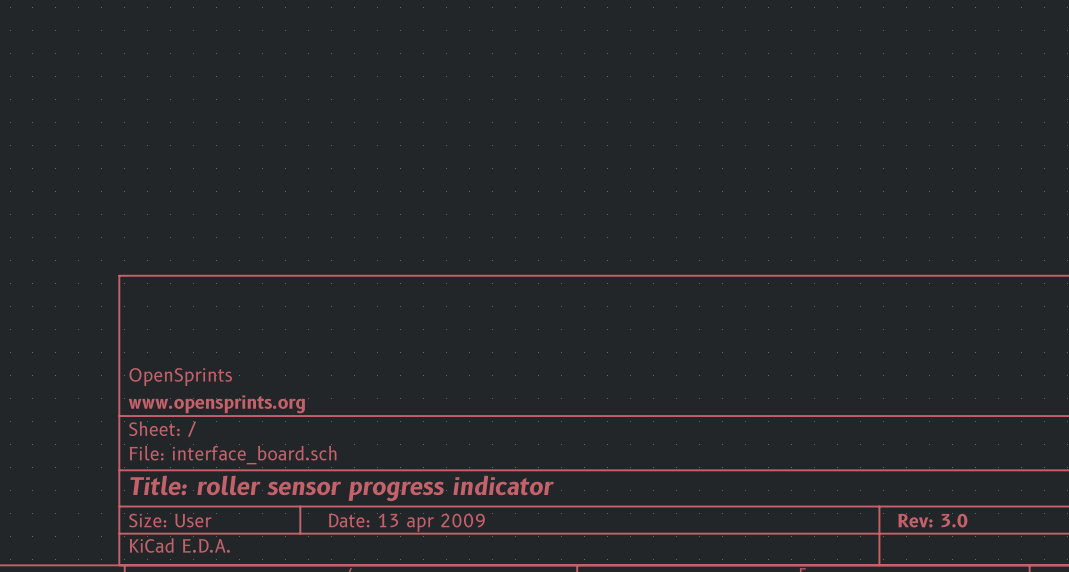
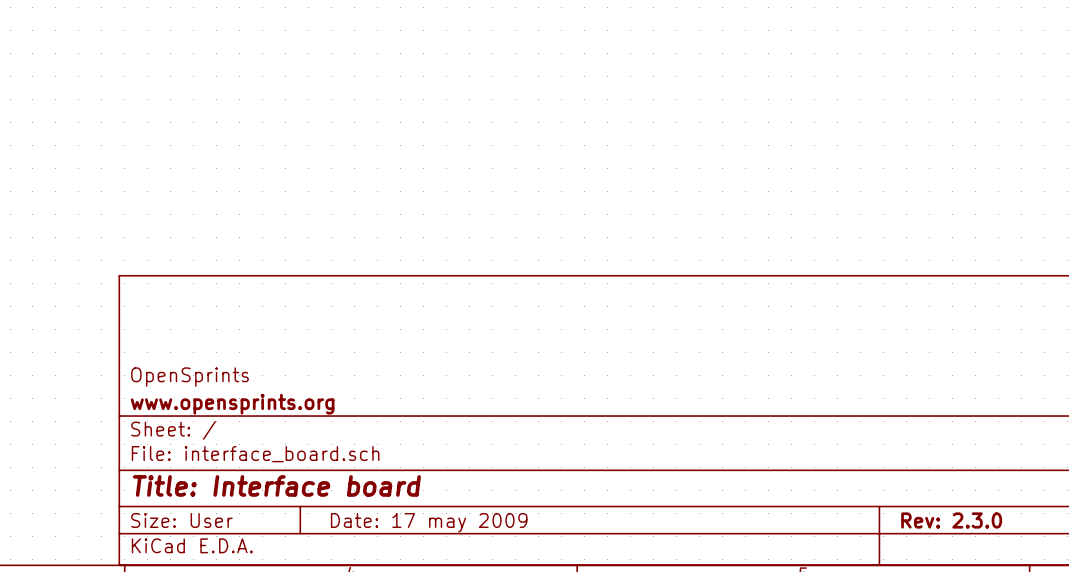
title block: Title: roller sensor progress indicator (342, 488) -> Title: Interface board (276, 485)
title block: Rev: 3.0 (932, 520) -> Rev: 2.3.0 (951, 520)
title block: Date: 13 apr 2009 (406, 522) -> Date: 17 may 2009 (429, 522)

